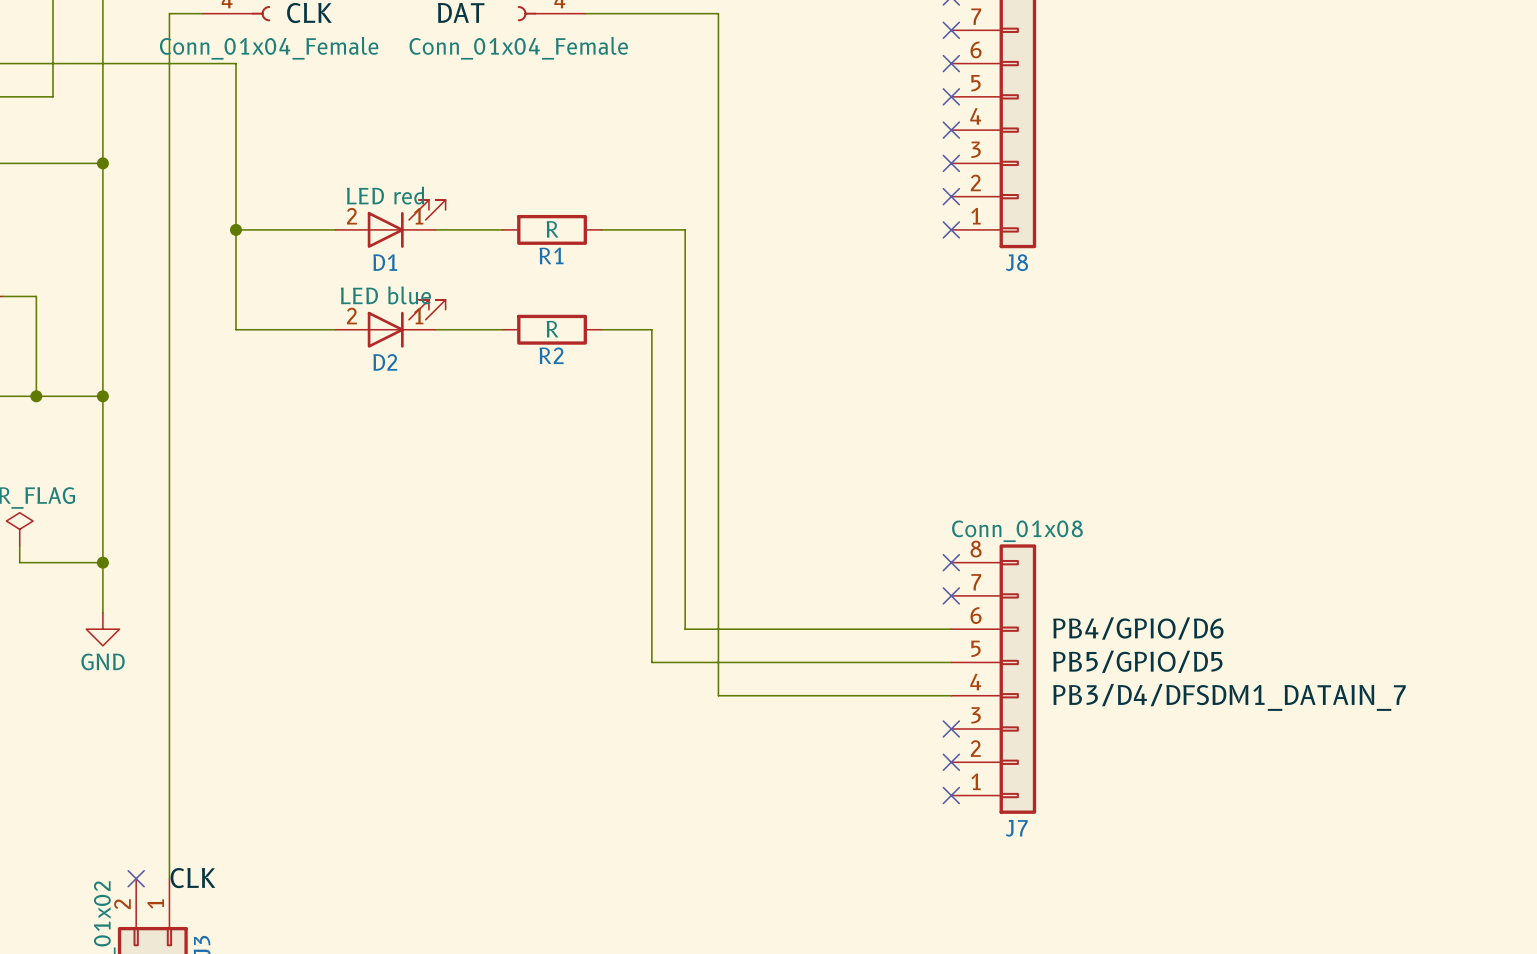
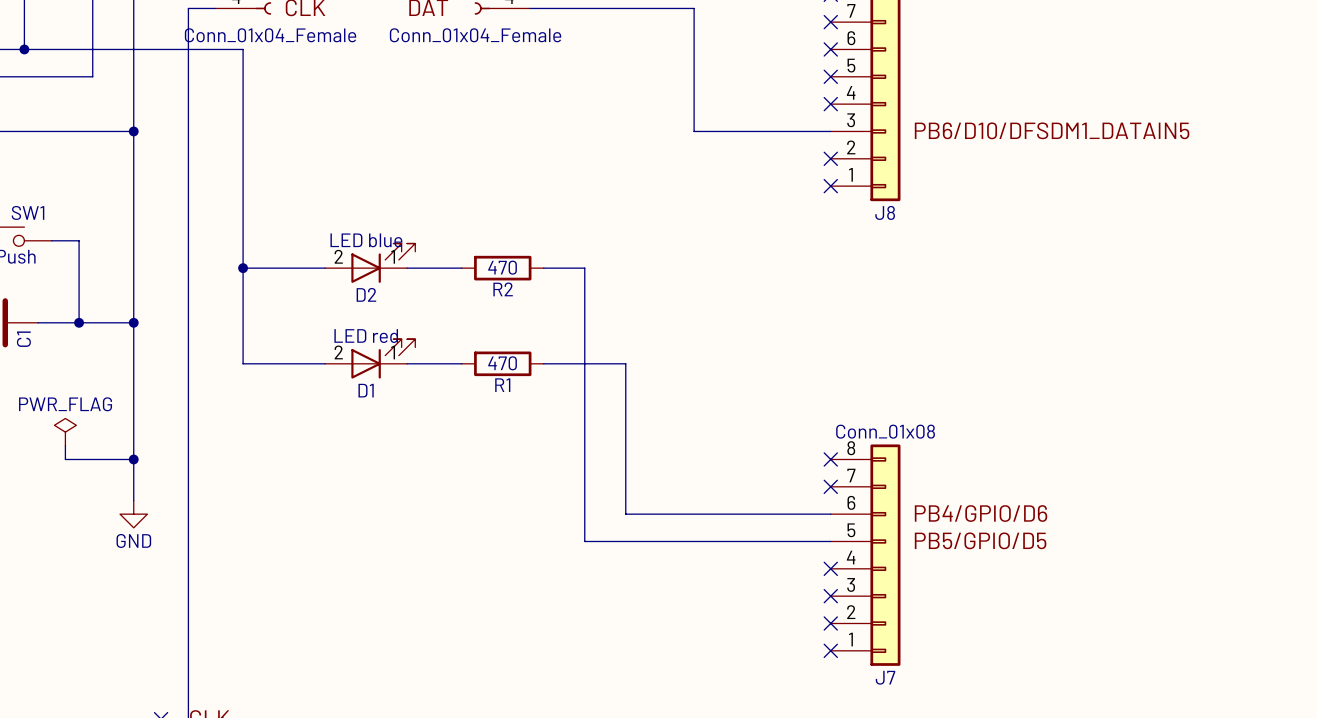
wire: (718, 13) (718, 695) (951, 695) -> (639, 8) (694, 8) (694, 131) (830, 131)
no-connect mark: (951, 163) -> none
label: none -> PB6/D10/DFSDM1_DATAIN5 (1052, 130)
D1 position: (390, 223) -> (370, 358)
wire: (235, 229) (335, 229) -> none
junction: (235, 229) -> none
wire: (435, 229) (502, 229) -> (407, 363) (461, 363)
R1 position: (552, 229) -> (502, 363)
R1 value: R (552, 229) -> 470 (502, 363)
wire: (601, 229) (685, 229) (685, 629) (701, 629) -> (543, 363) (625, 363) (625, 514)
wire: none -> (243, 268) (243, 363) (325, 363)
junction: none -> (243, 268)
R2 value: R (552, 329) -> 470 (502, 267)
no-connect mark: none -> (830, 568)
label: PB3/D4/DFSDM1_DATAIN_7 (1229, 697) -> none

